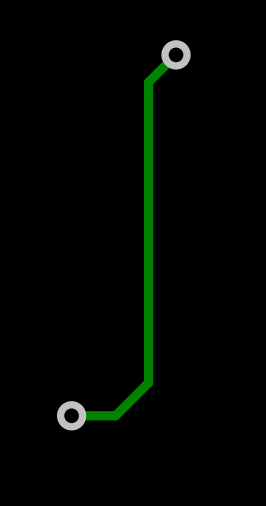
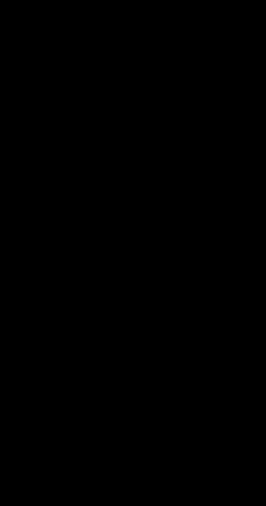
track: (176, 54) (148, 82) (148, 382) (115, 415) (71, 415) -> none
via: (176, 54) -> none
via: (71, 415) -> none

